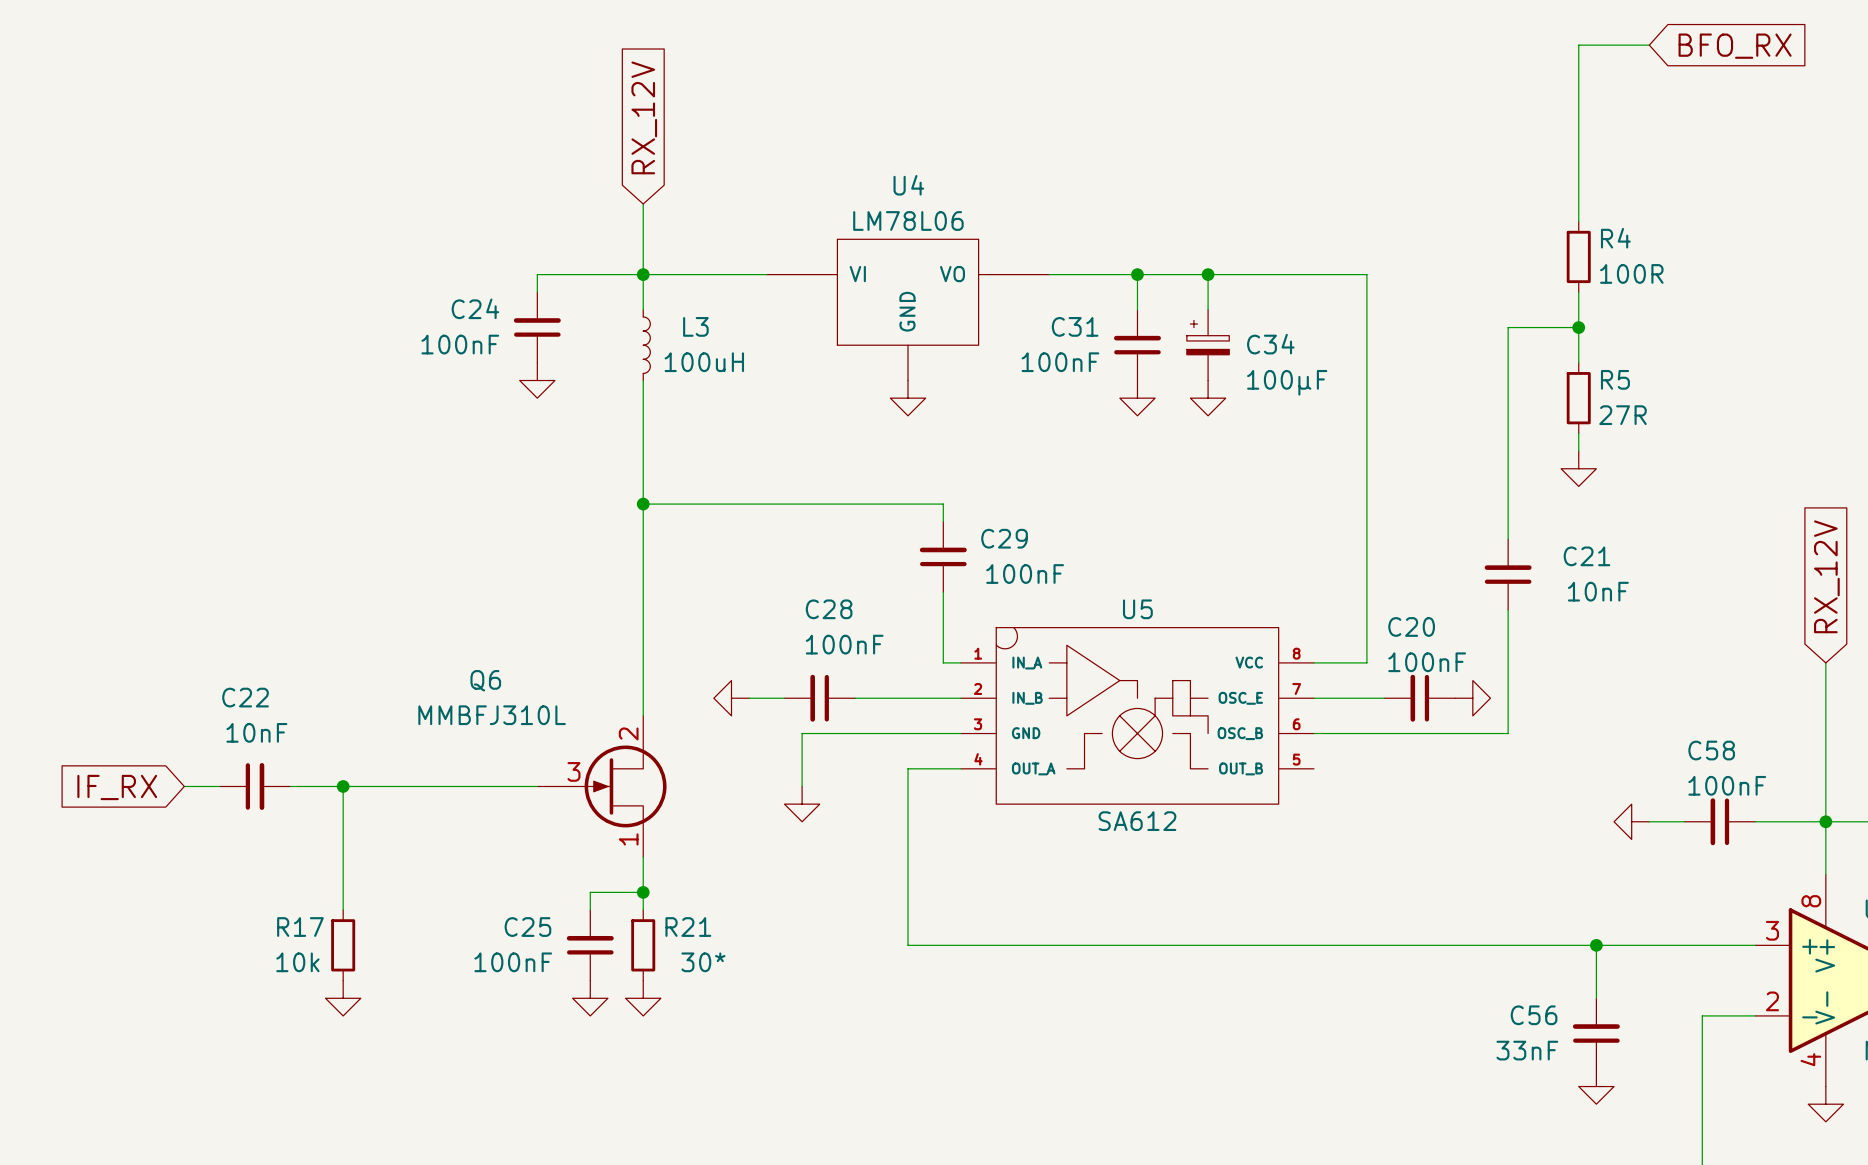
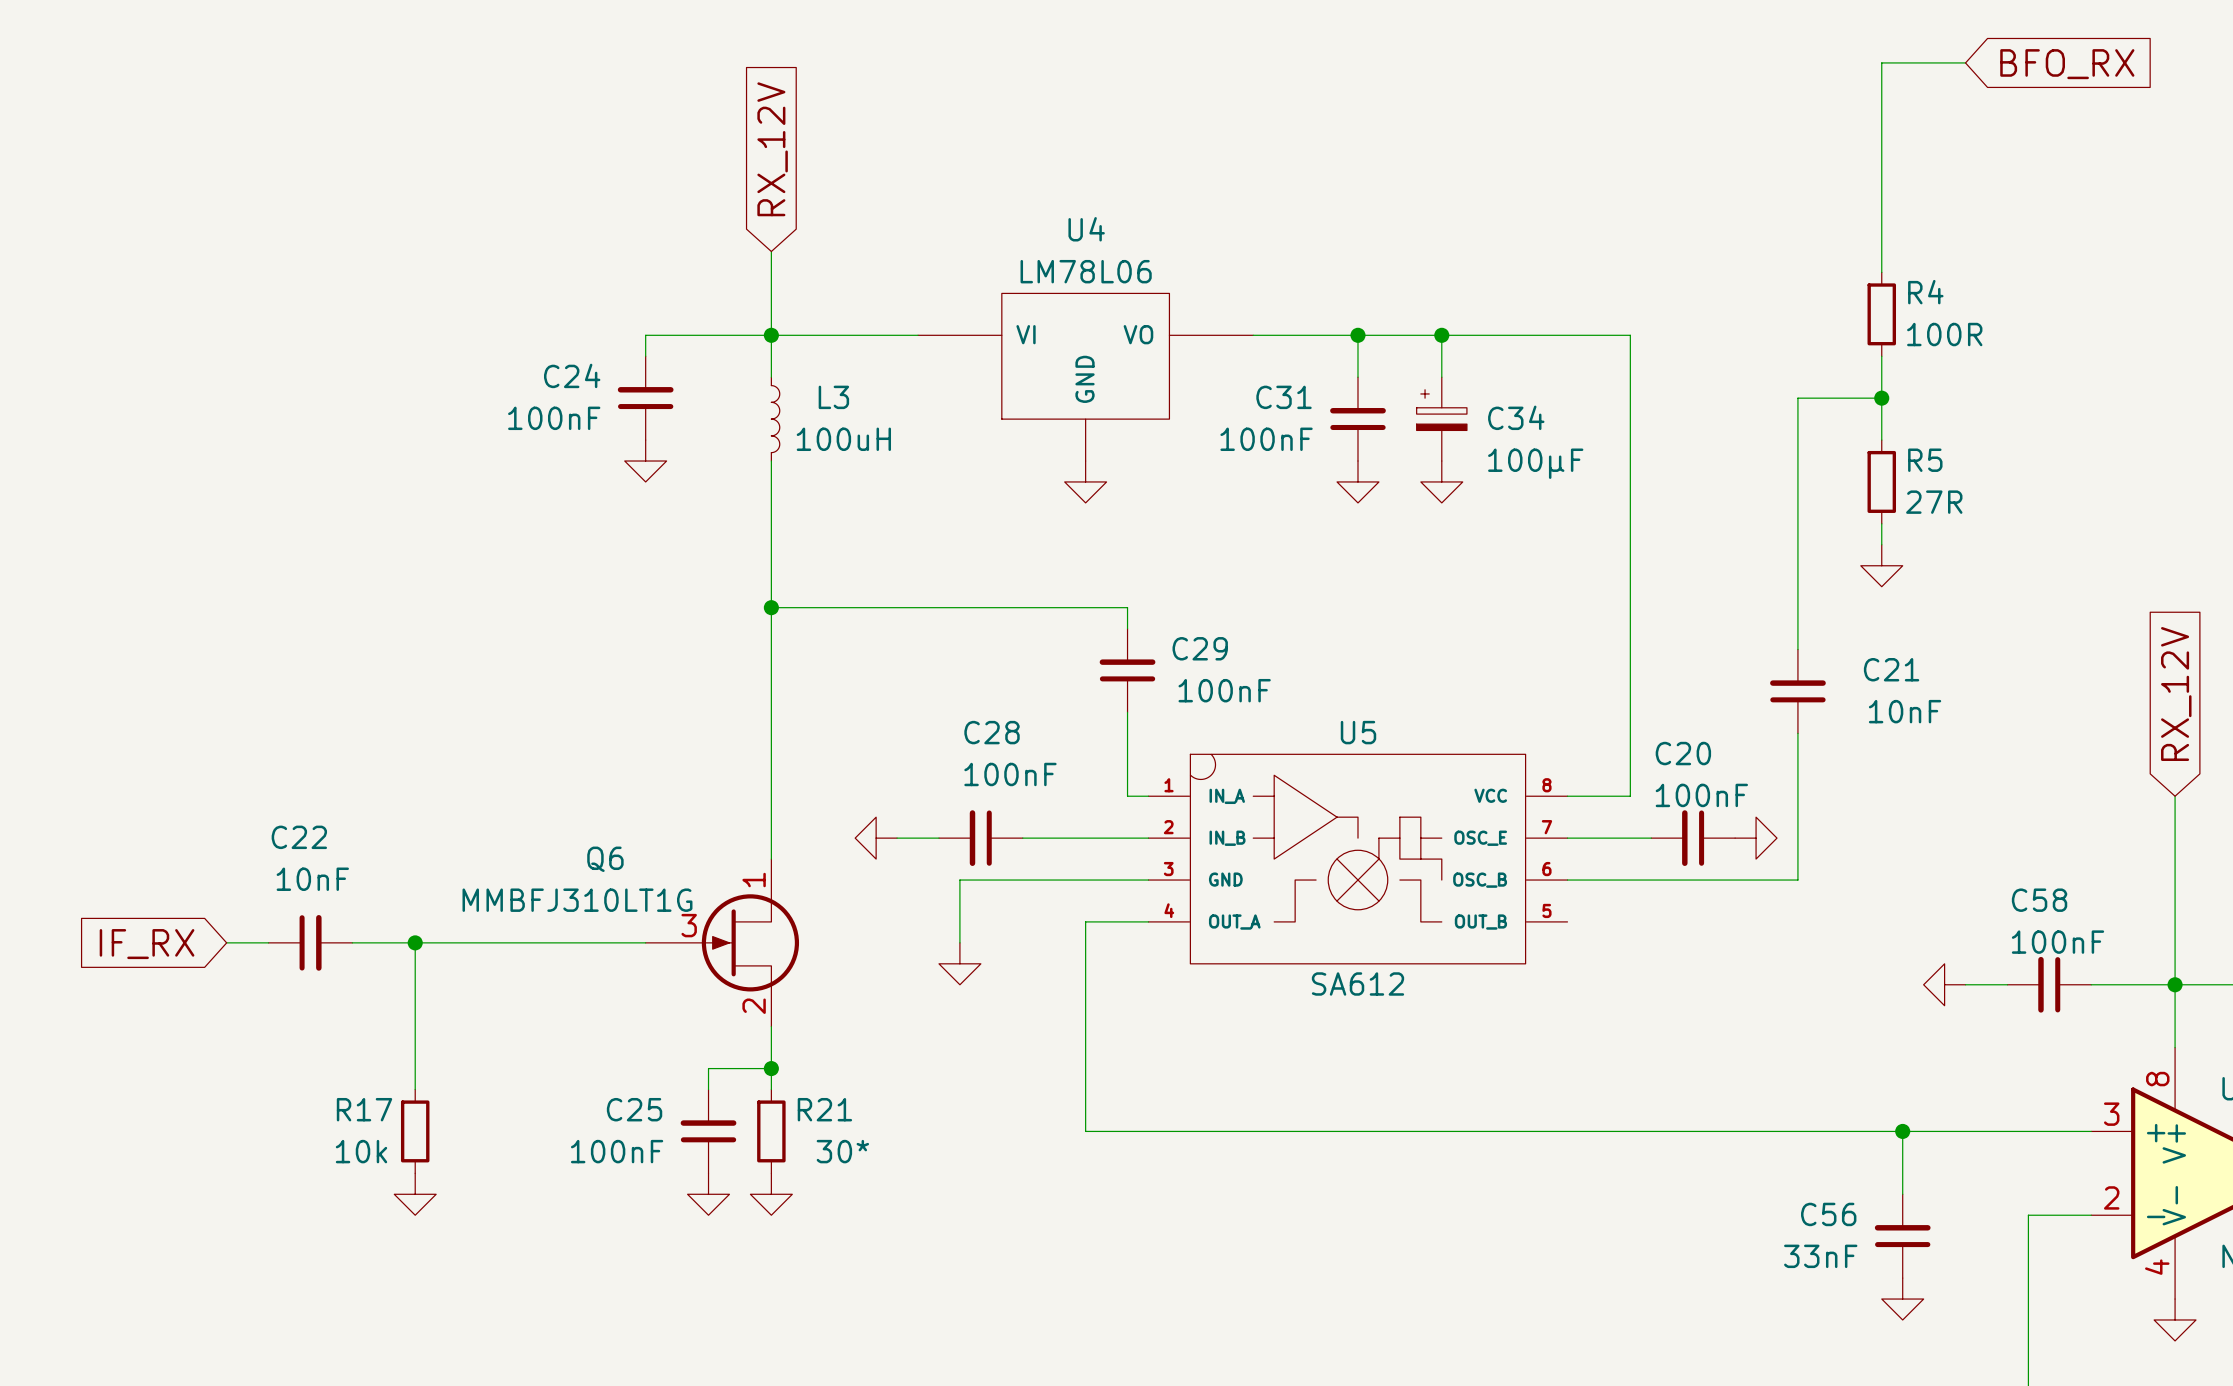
Q6 name position: Q6 (485, 680) -> Q6 (605, 859)
Q6 value: MMBFJ310L (492, 715) -> MMBFJ310LT1G (577, 900)
Q6 pin number: 2 (628, 733) -> 1 (754, 880)
Q6 pin number: 1 (628, 839) -> 2 (754, 1006)

